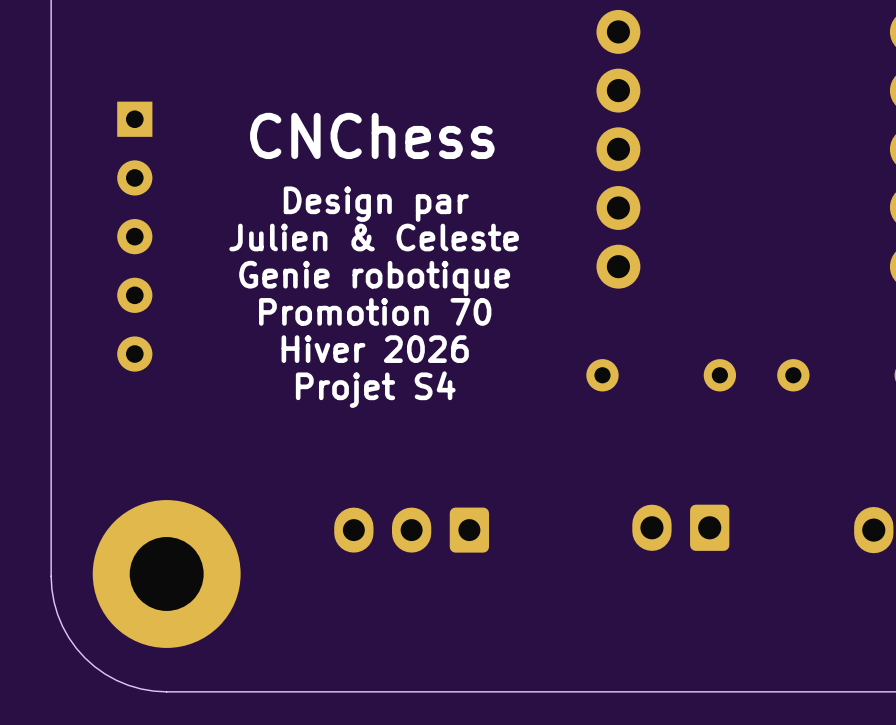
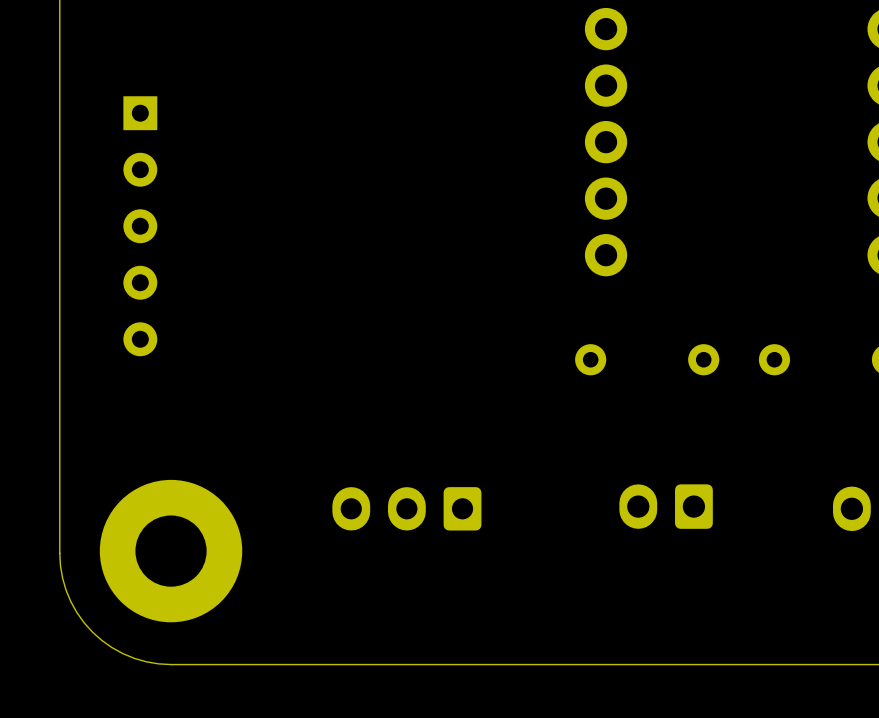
text: CNChess (372, 135) -> none
text: Design par (376, 204) -> none
text: Julien & Celeste (374, 237) -> none
text: Genie robotique (374, 278) -> none
text: Promotion 70 (375, 311) -> none
text: Hiver 2026 (375, 349) -> none
text: Projet S4 (375, 389) -> none

